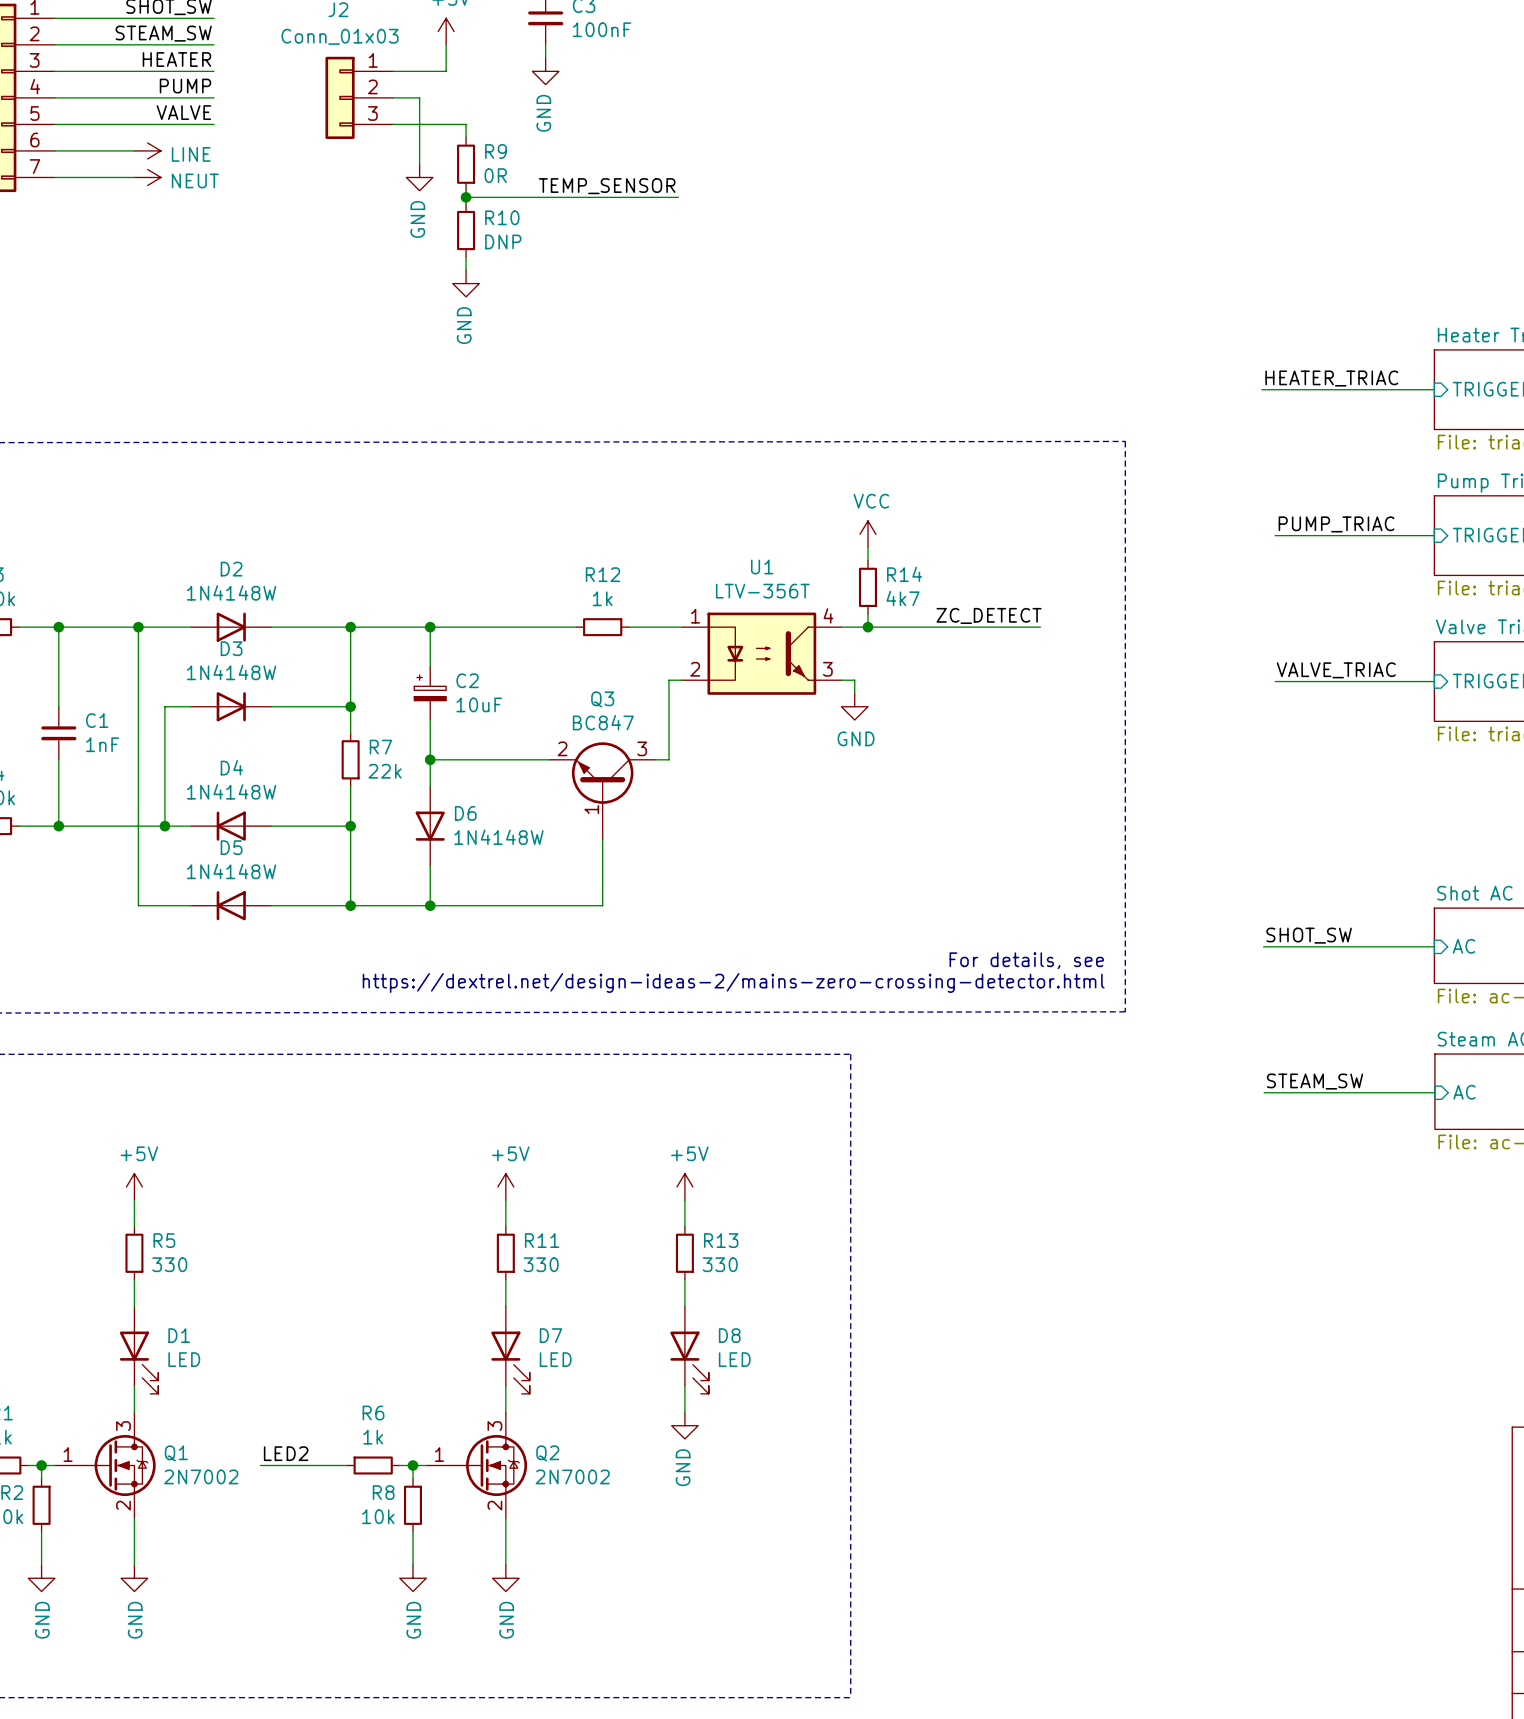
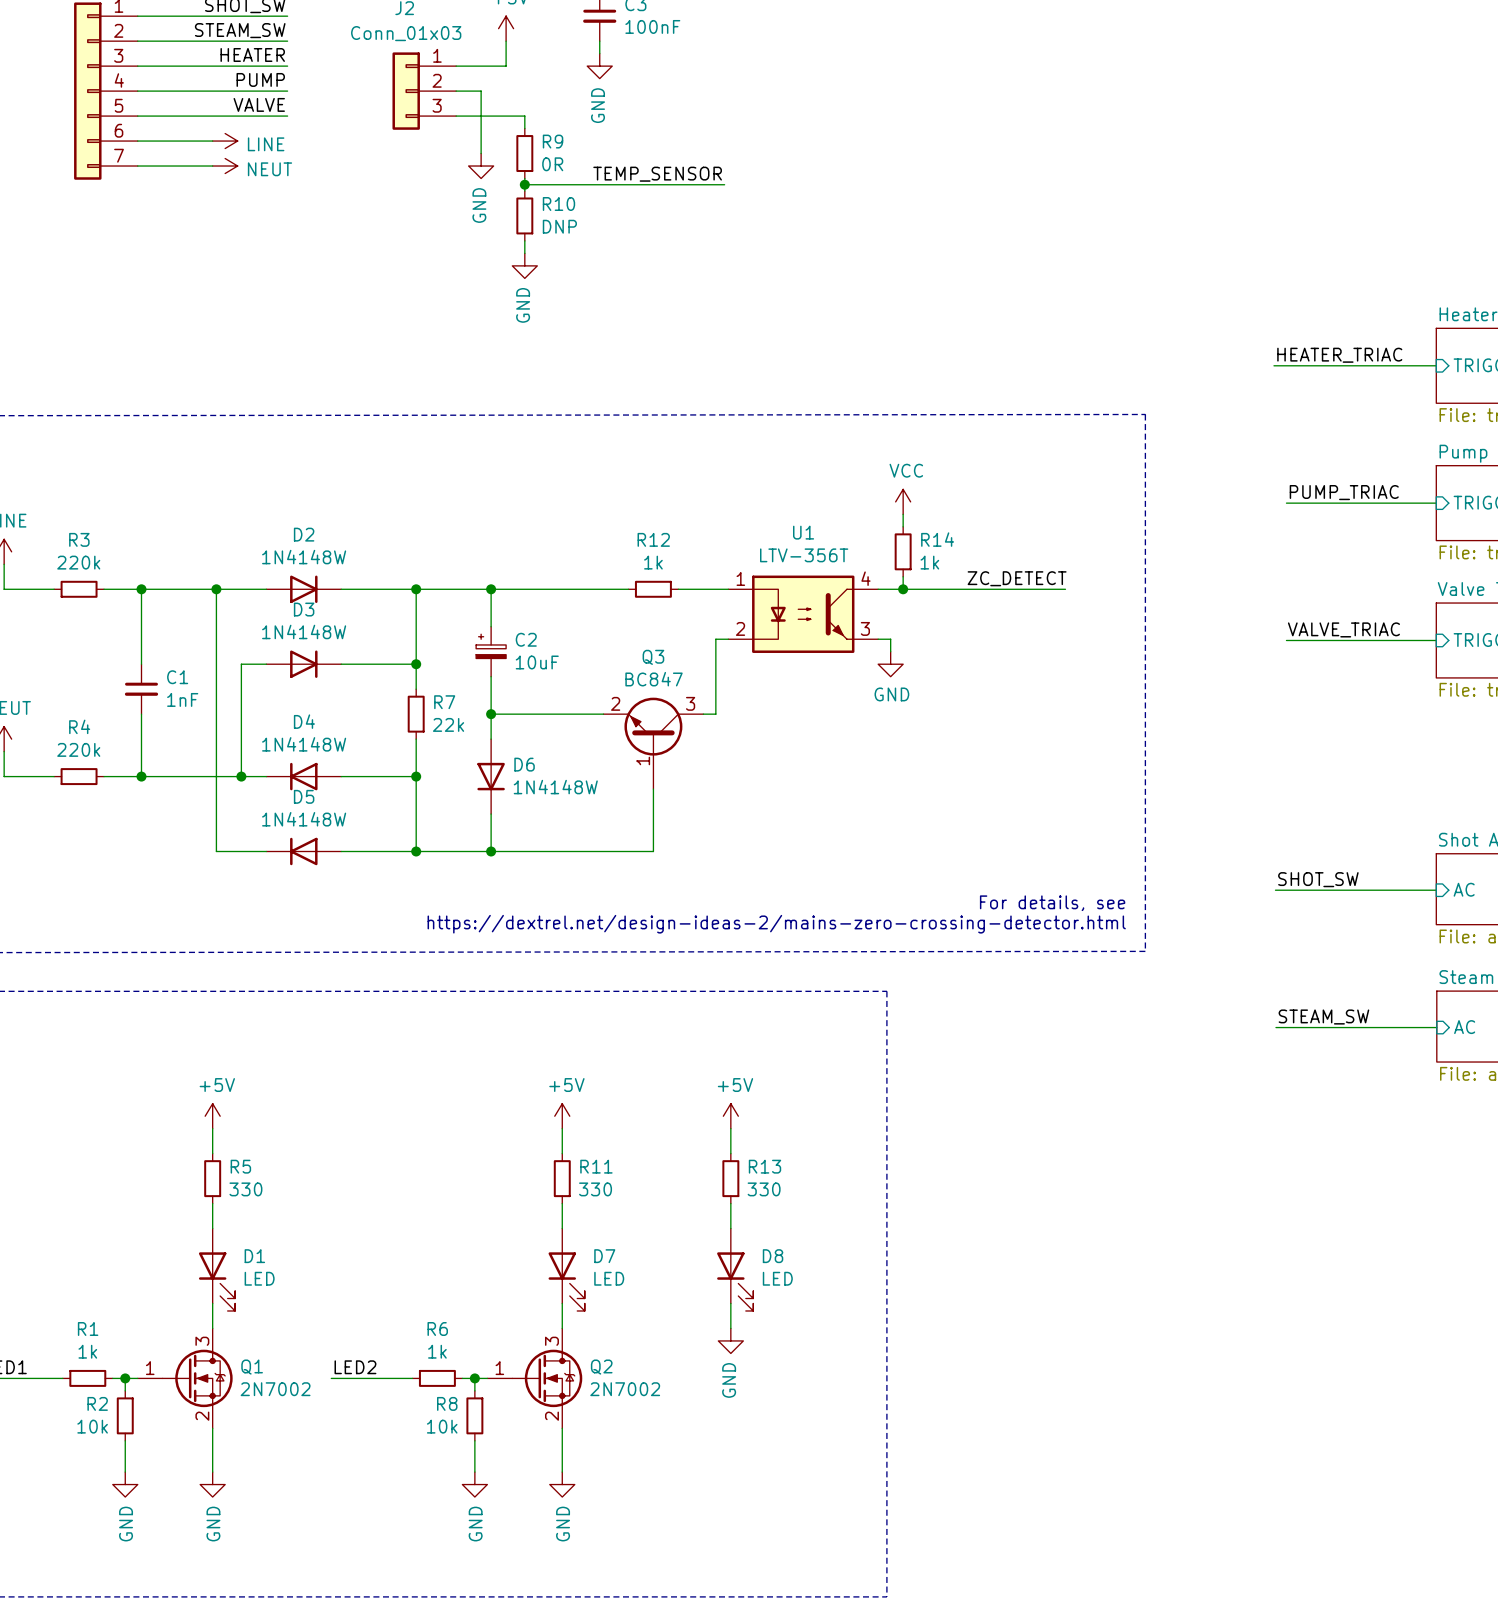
R14 value: 4k7 (902, 598) -> 1k (929, 562)

